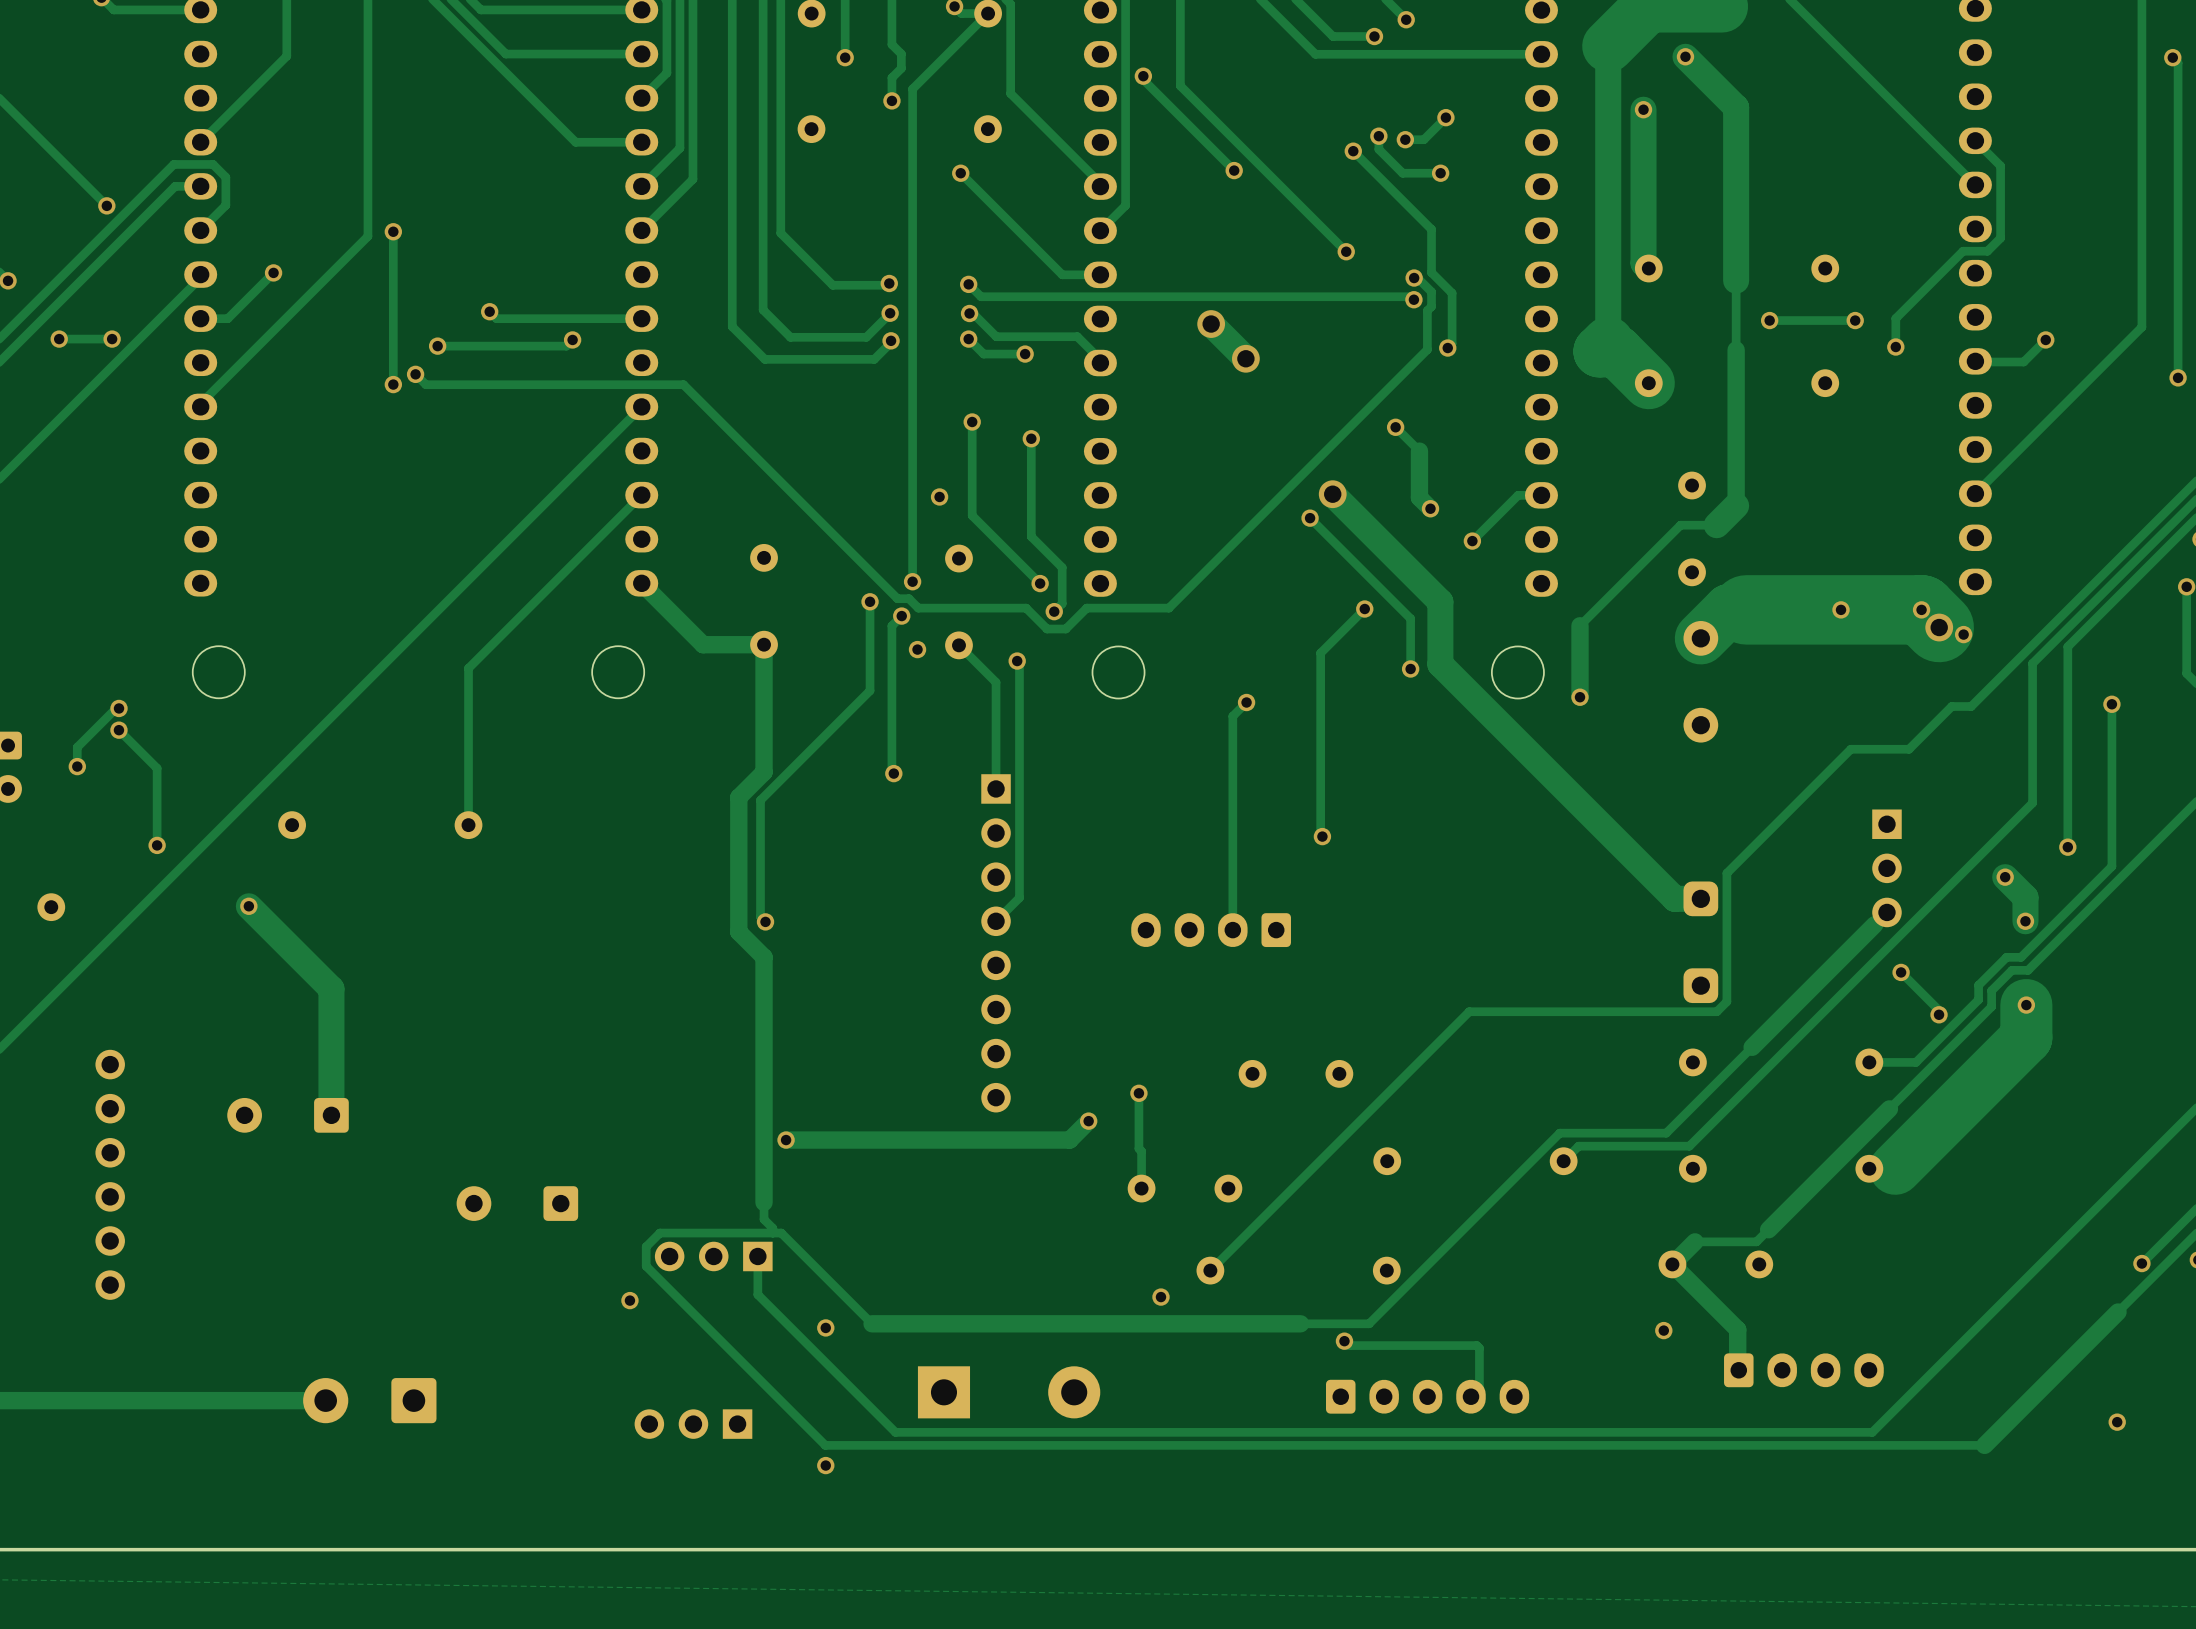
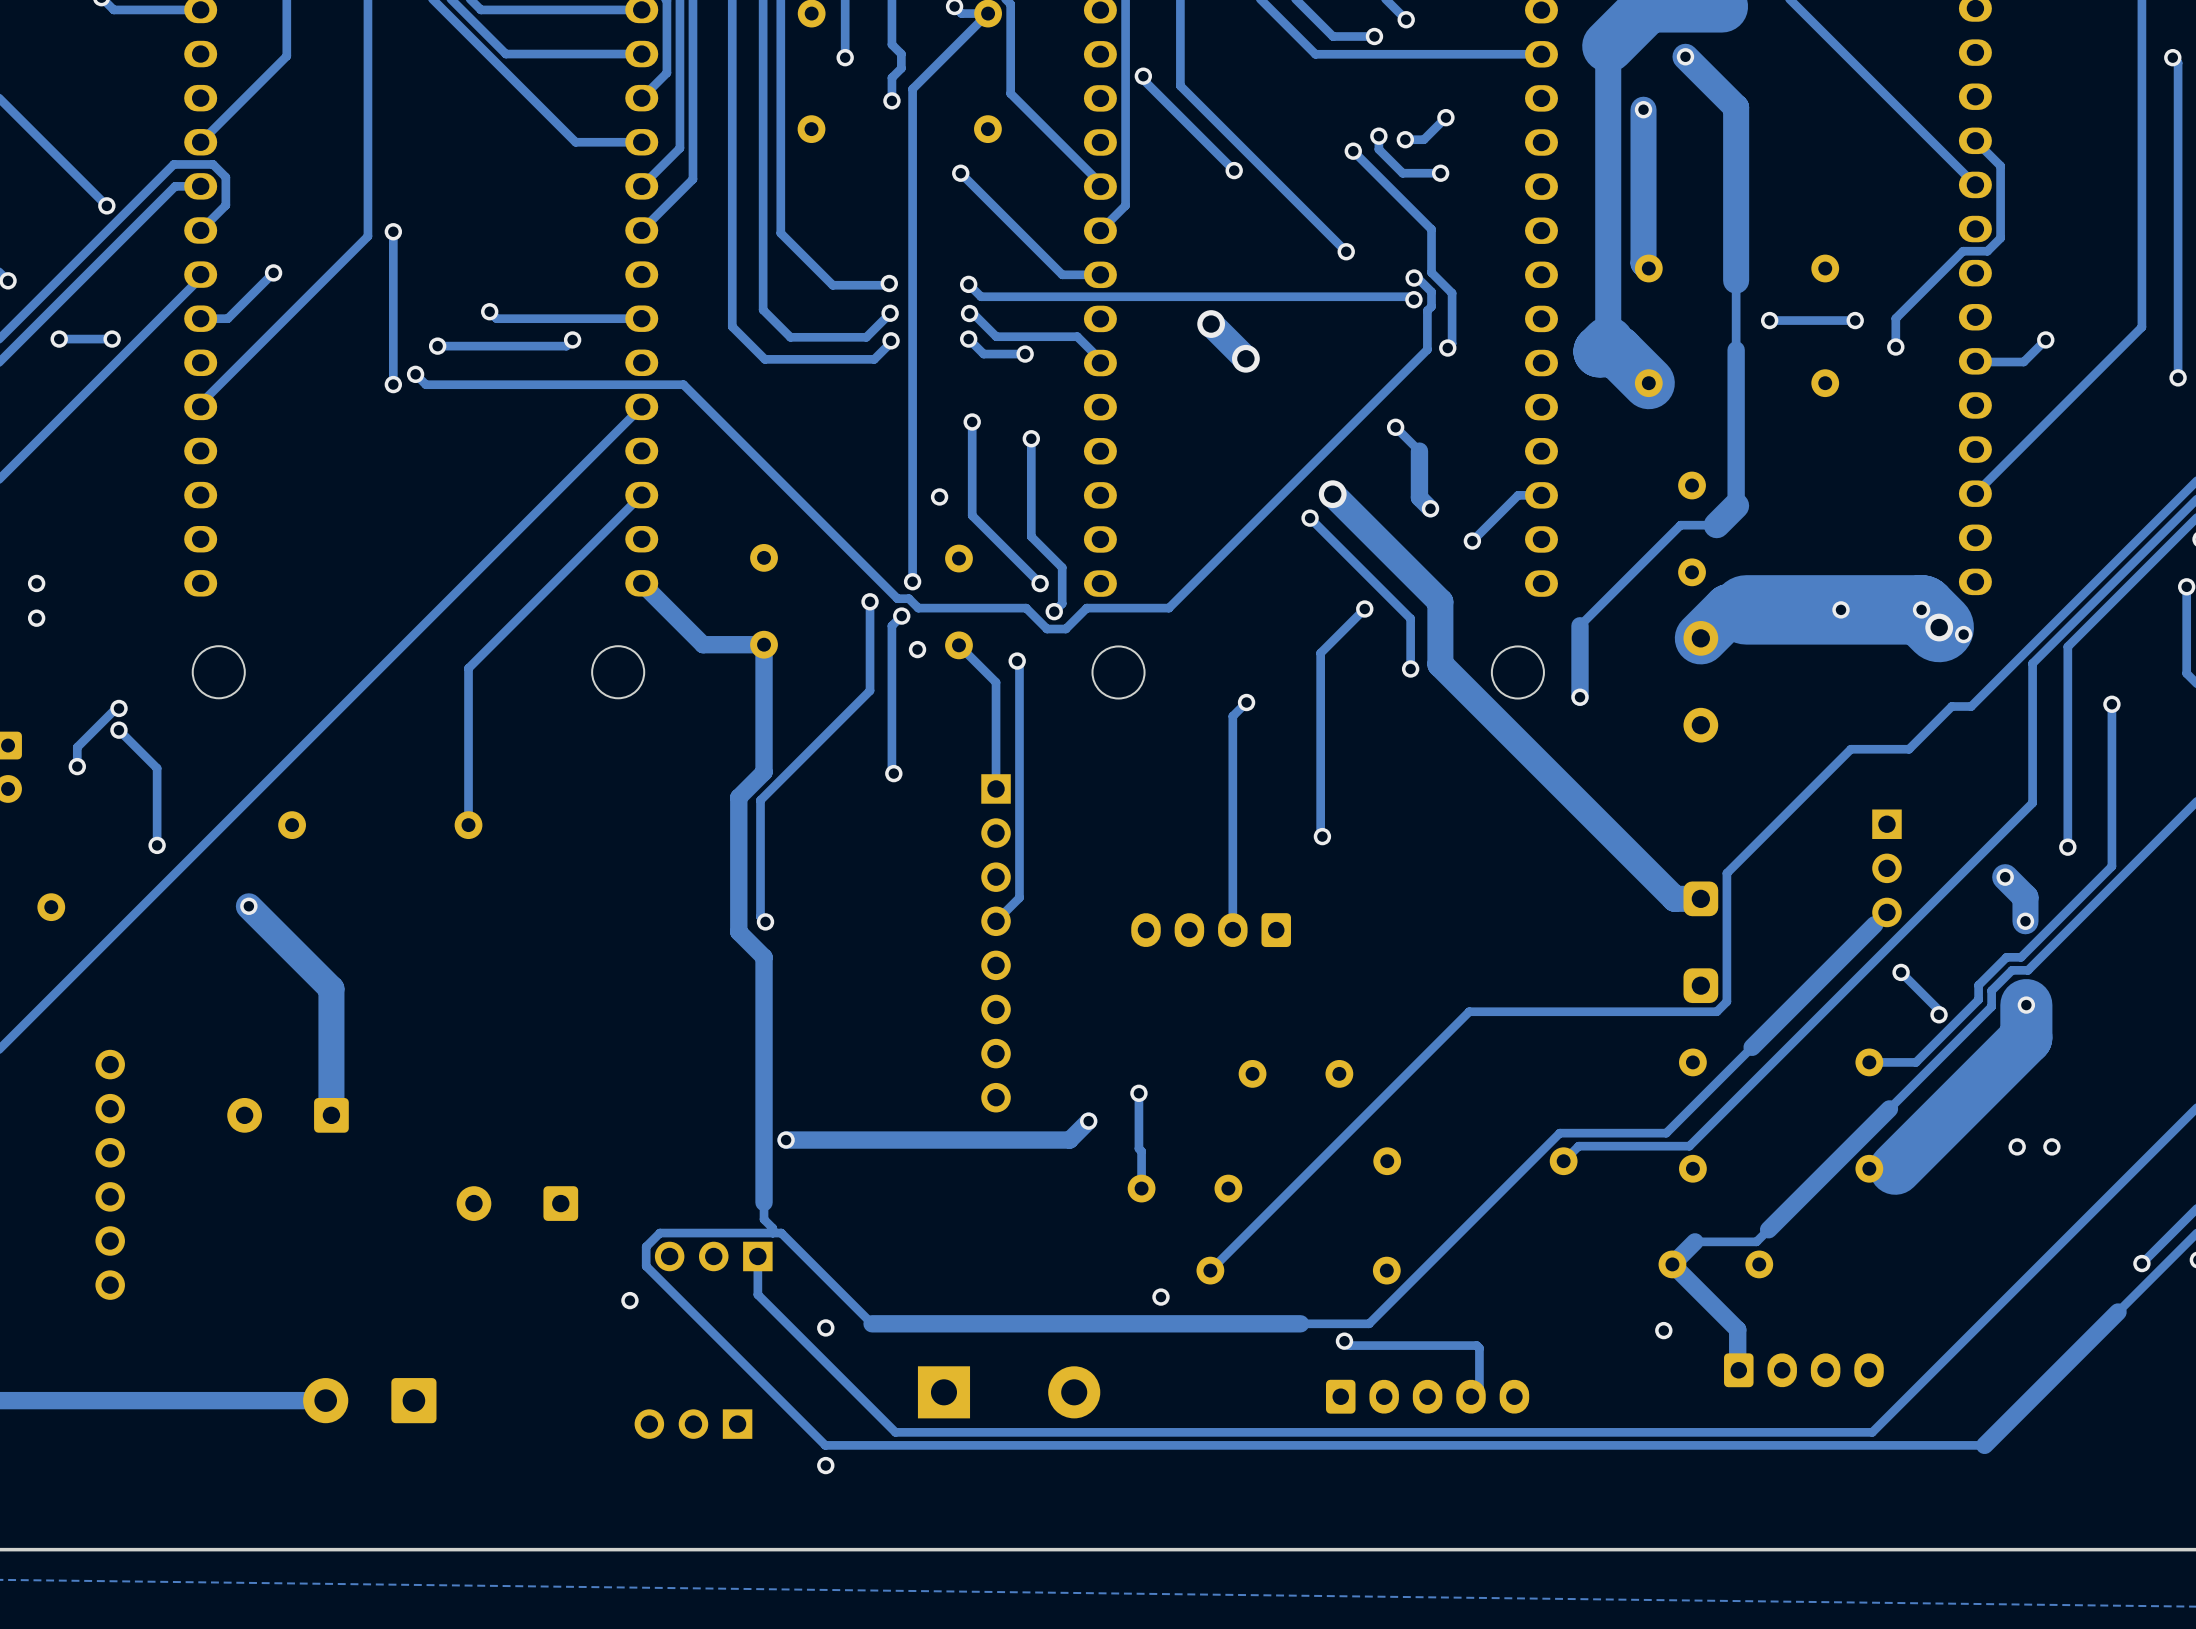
via: none -> (36, 583)
via: none -> (36, 618)
via: none -> (2017, 1146)
via: none -> (2051, 1146)
via: (2117, 1422) -> none

